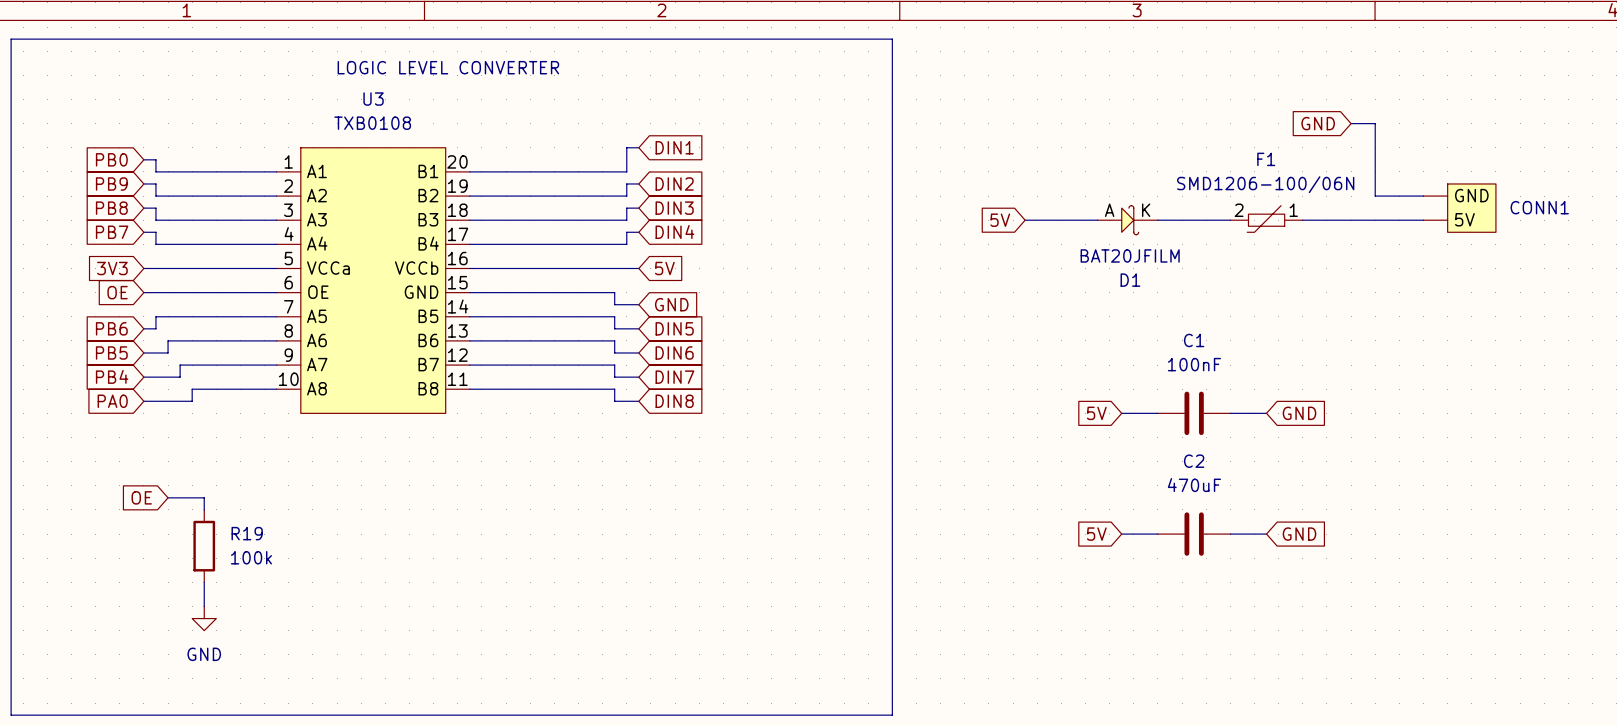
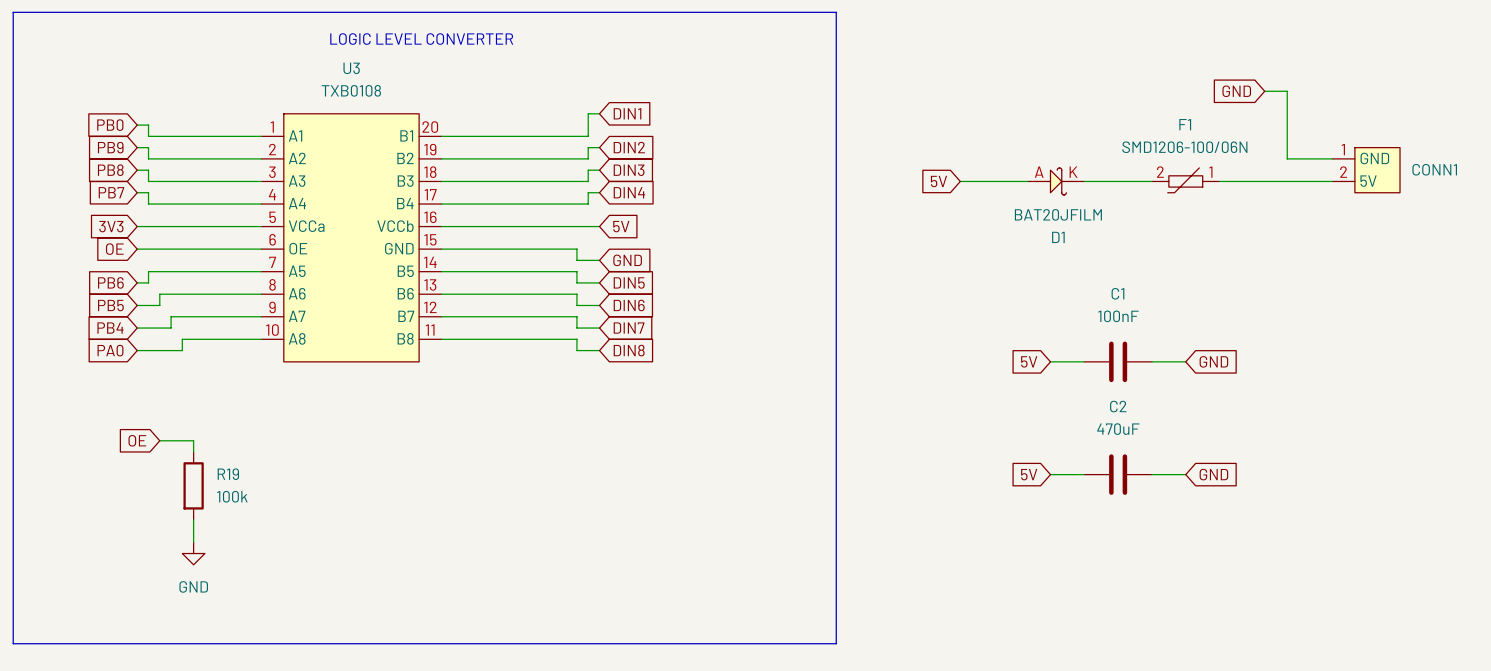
CONN1 pin number: none -> 1 (1343, 149)
CONN1 pin number: none -> 2 (1343, 172)

